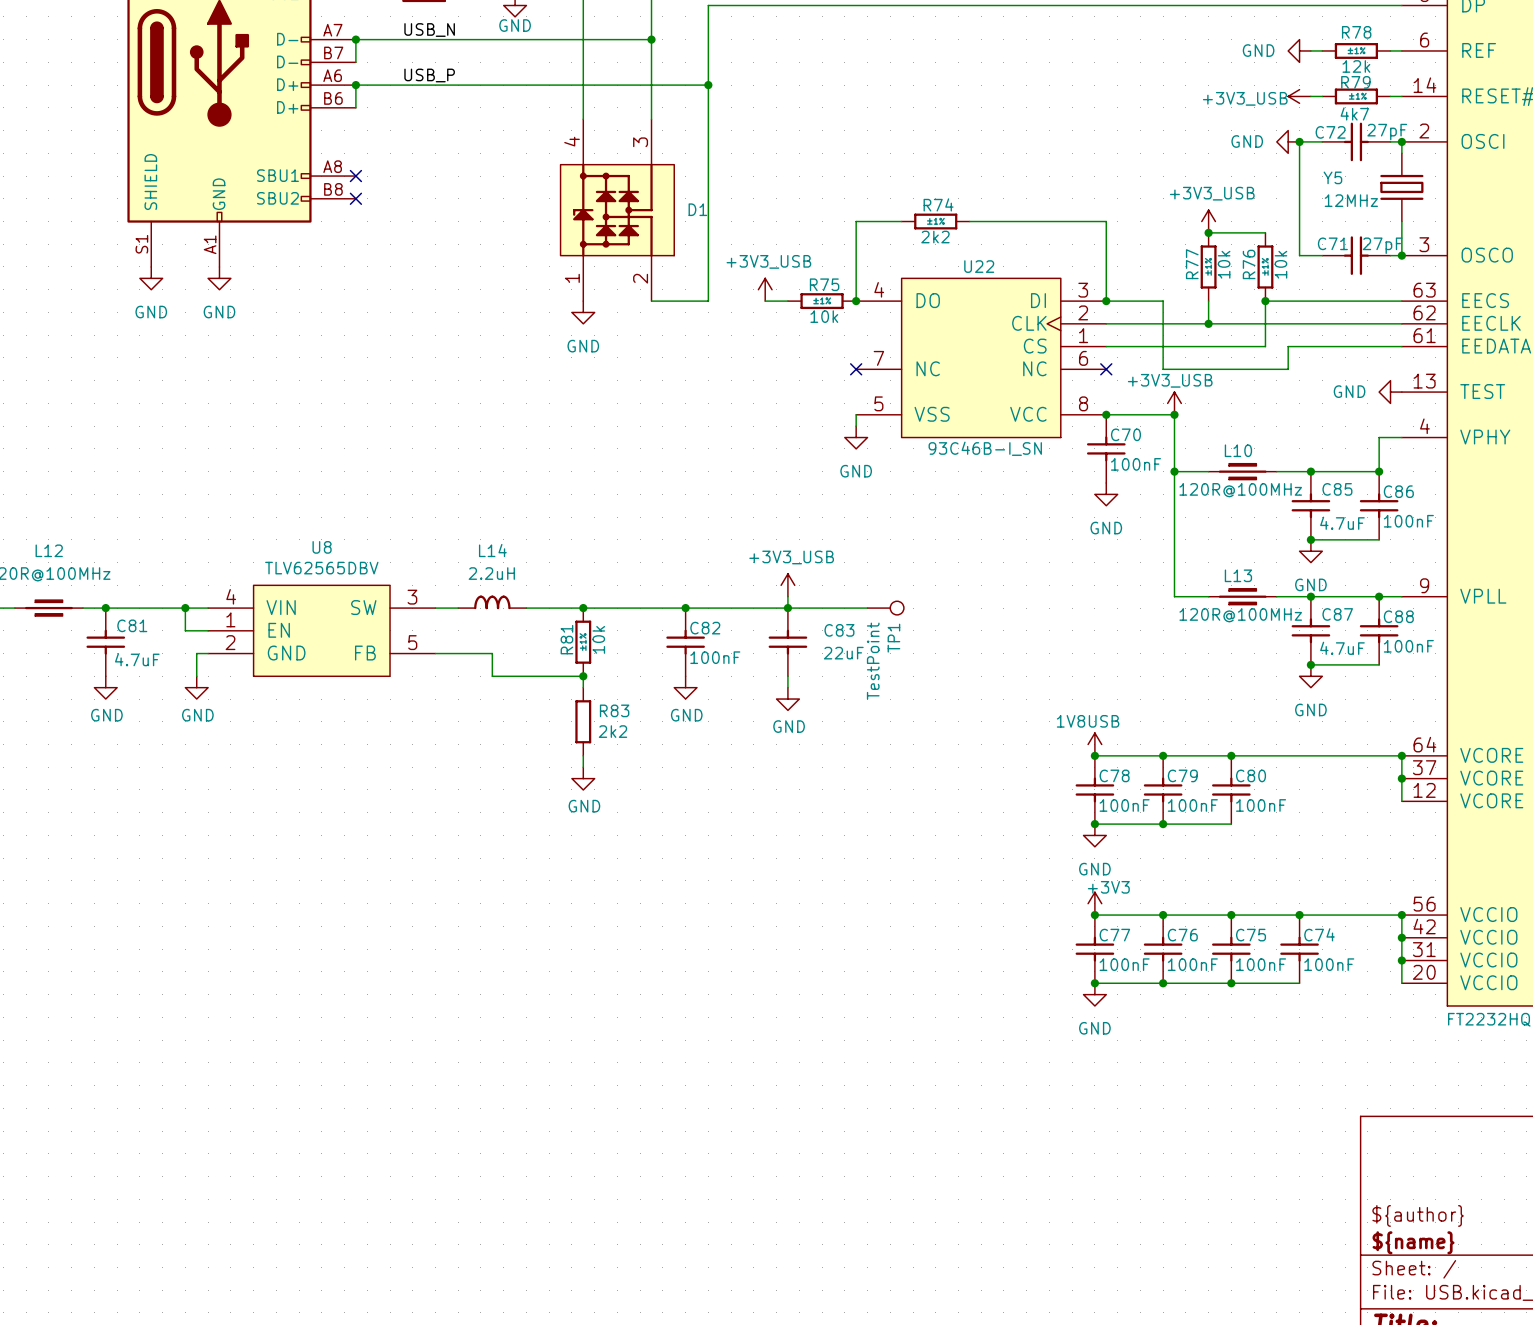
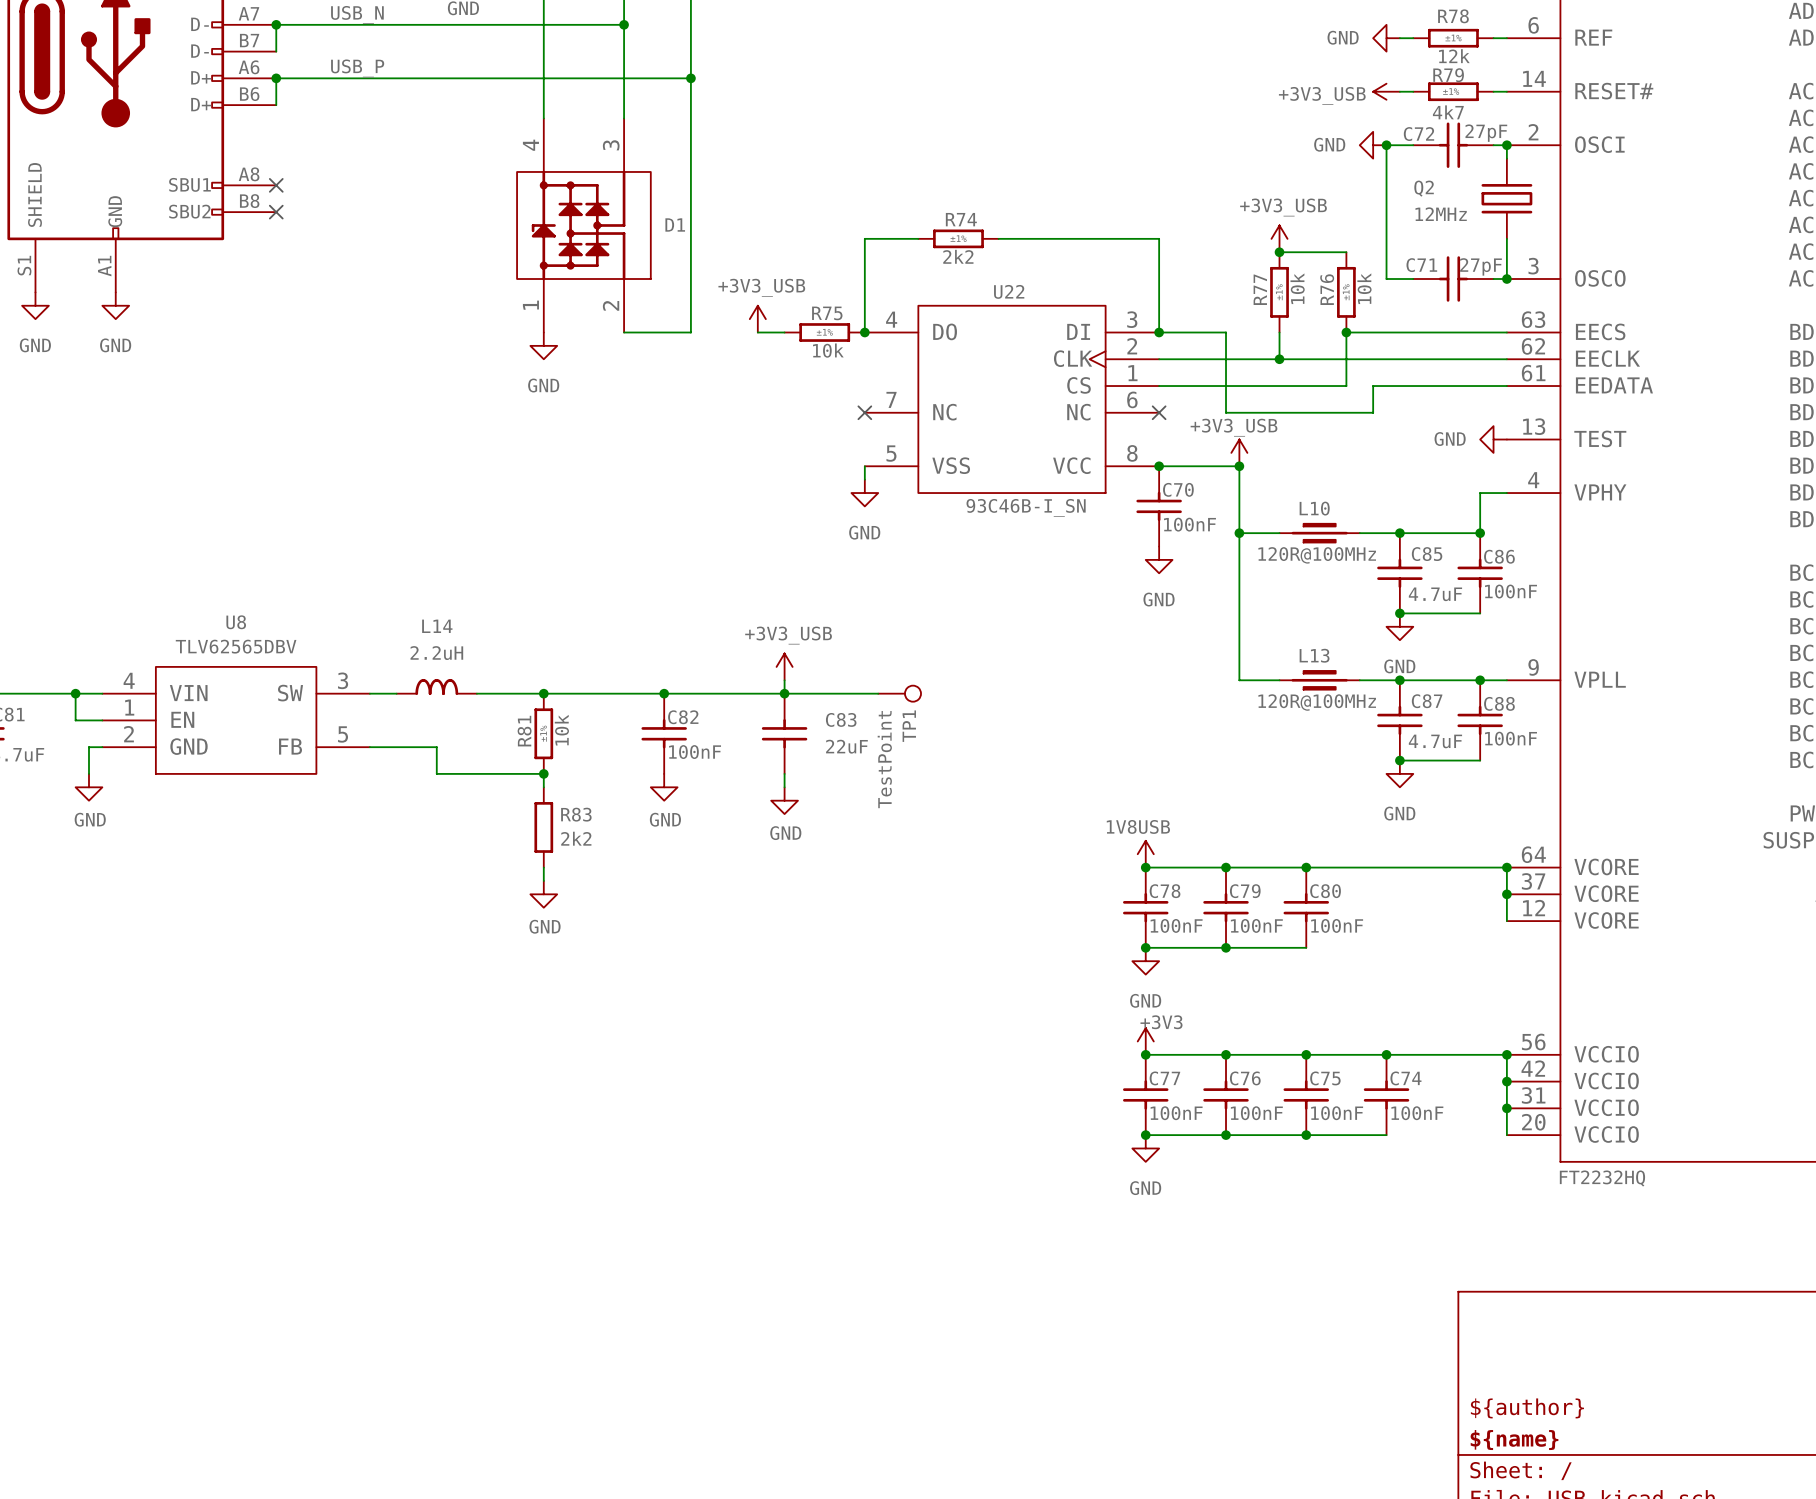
Y5 name: Y5 (1332, 177) -> Q2 (1424, 188)

